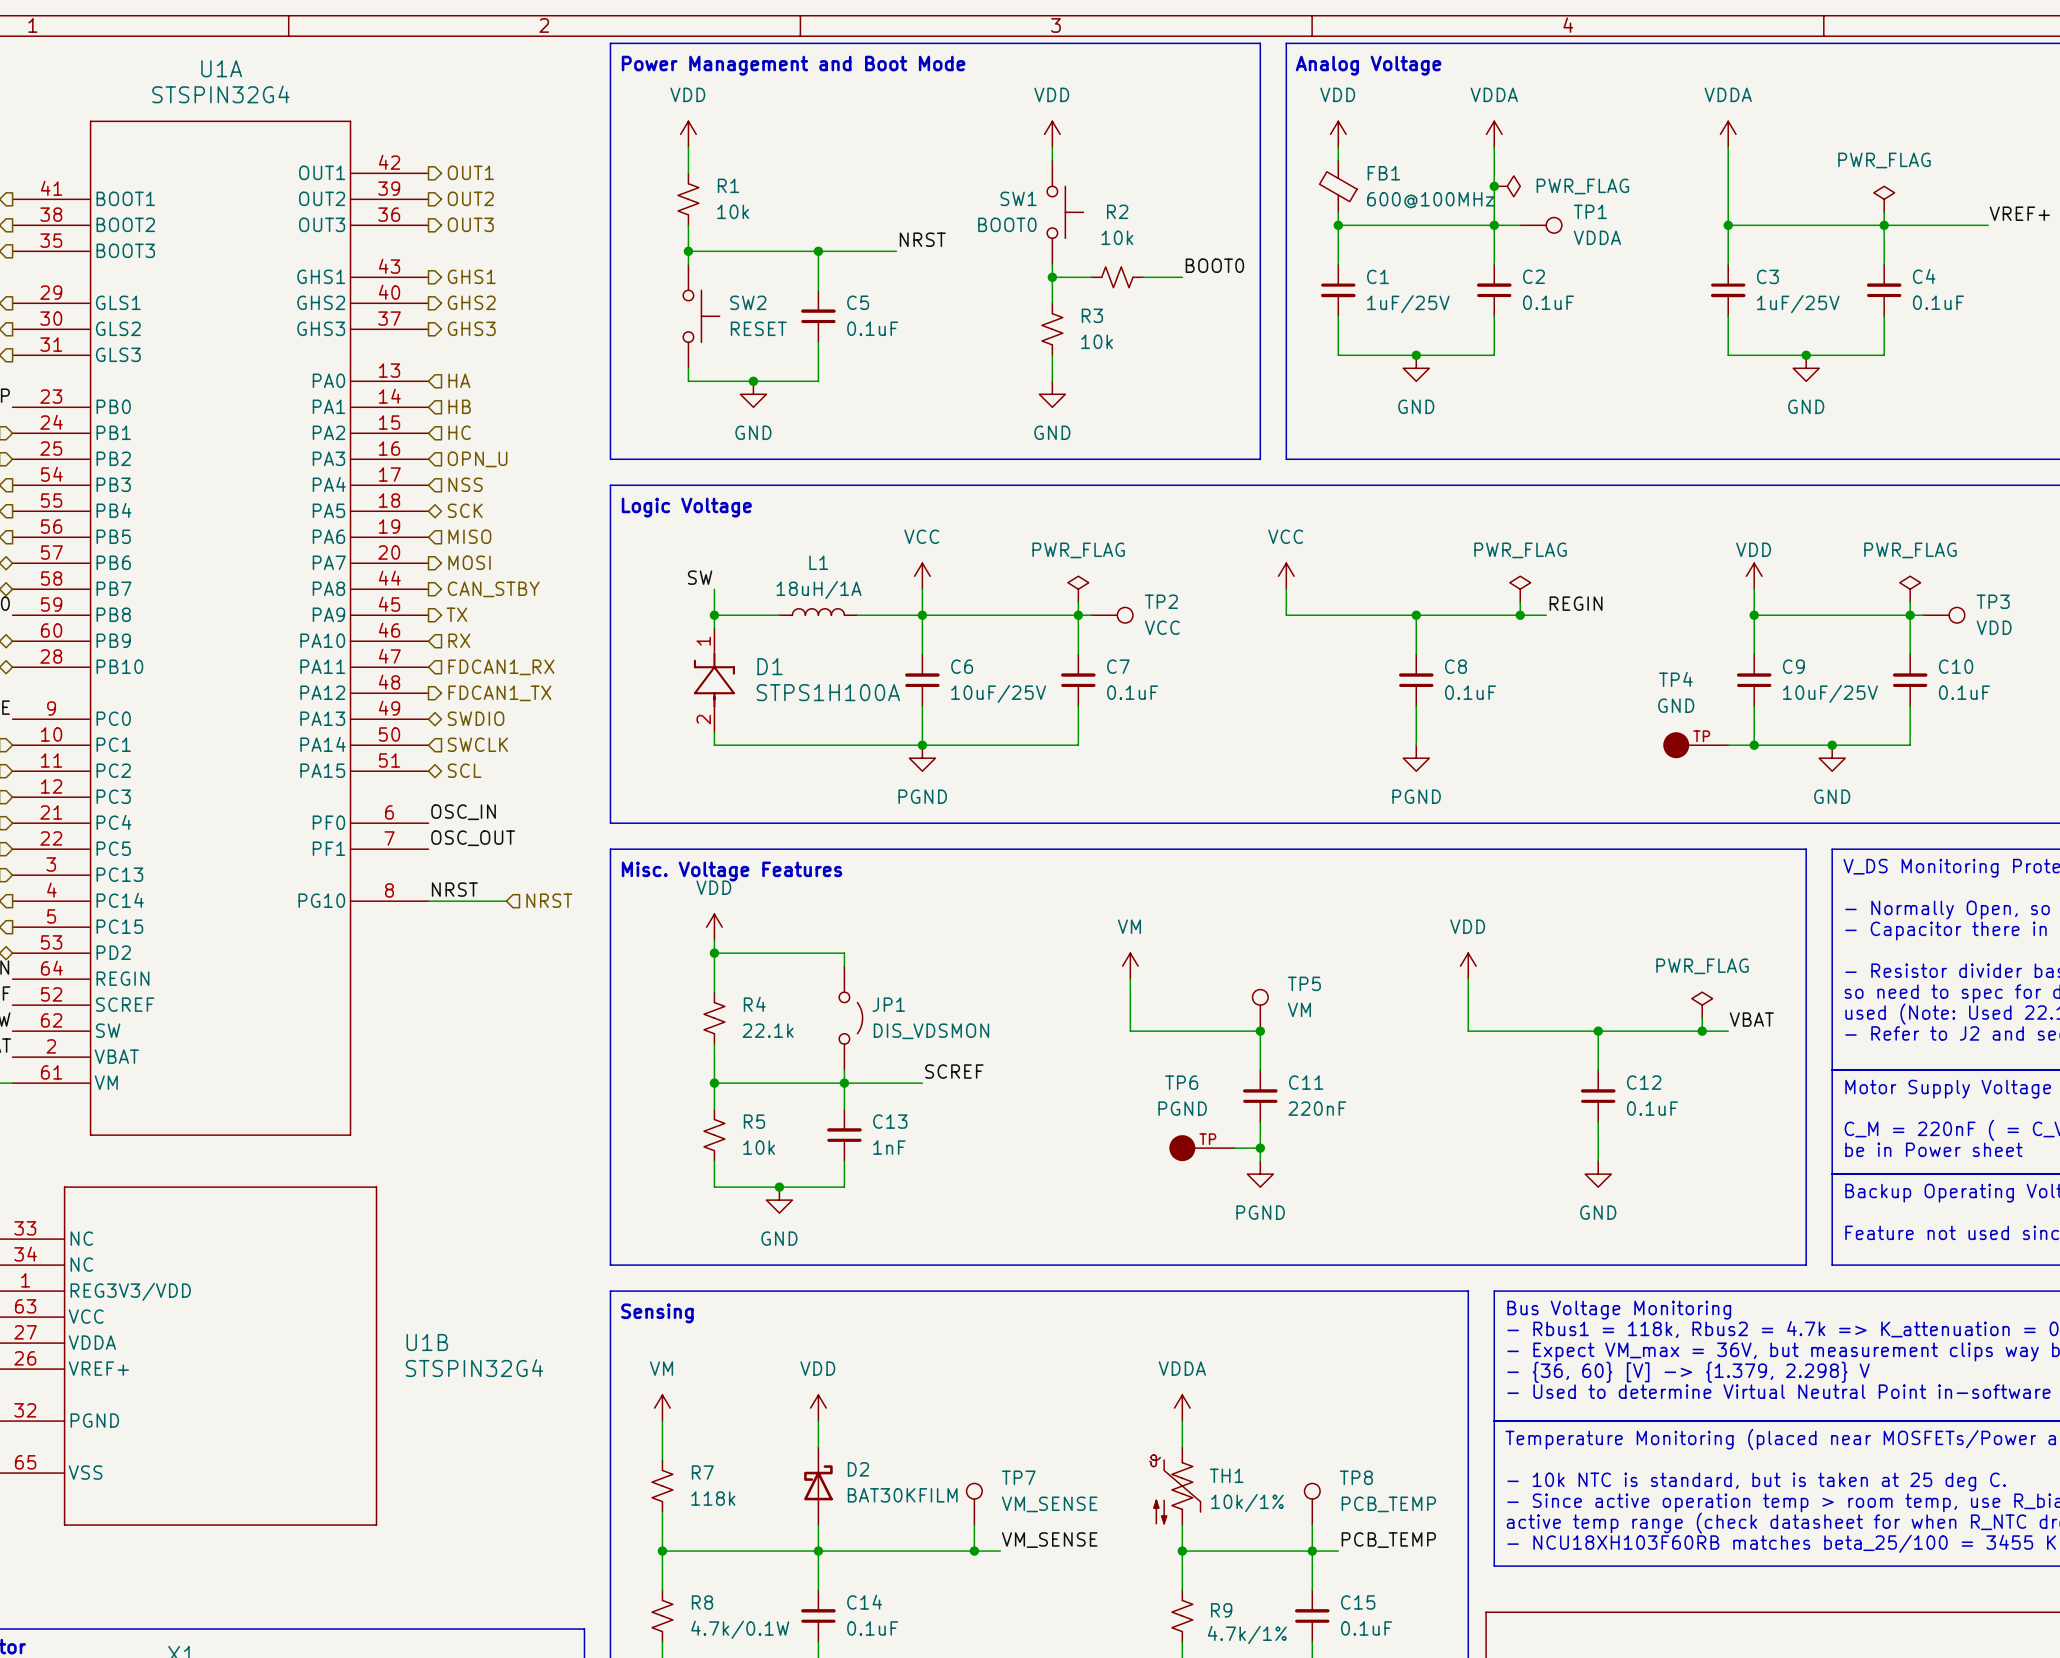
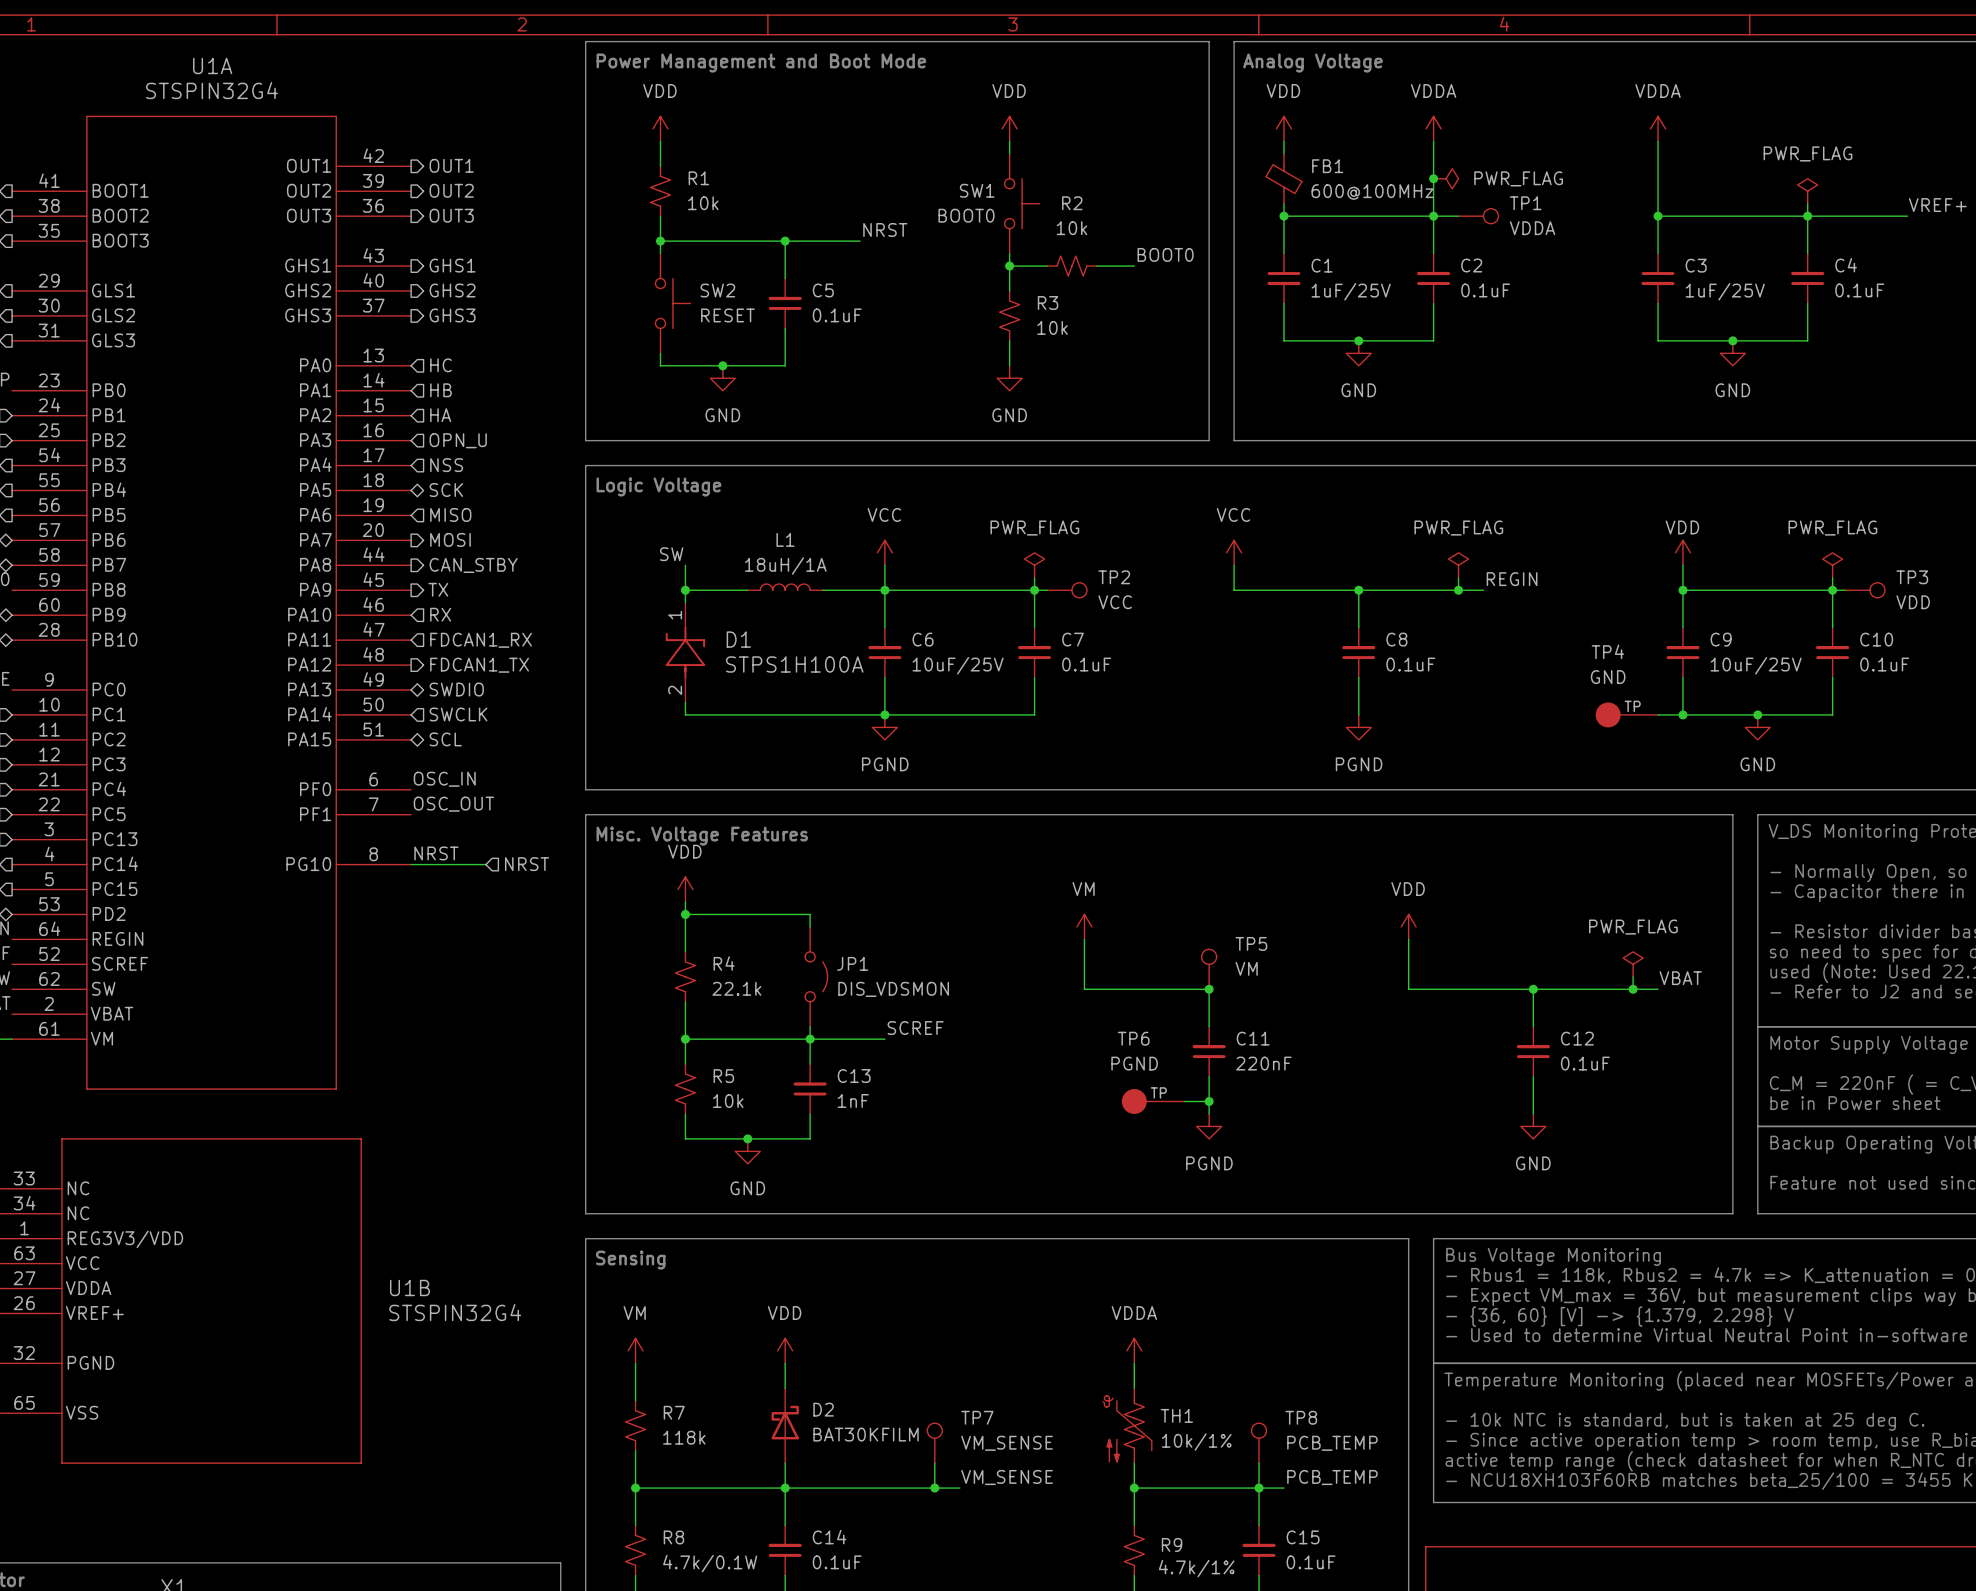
hierarchical label: HA (459, 380) -> HC (440, 365)
hierarchical label: HC (459, 432) -> HA (440, 415)

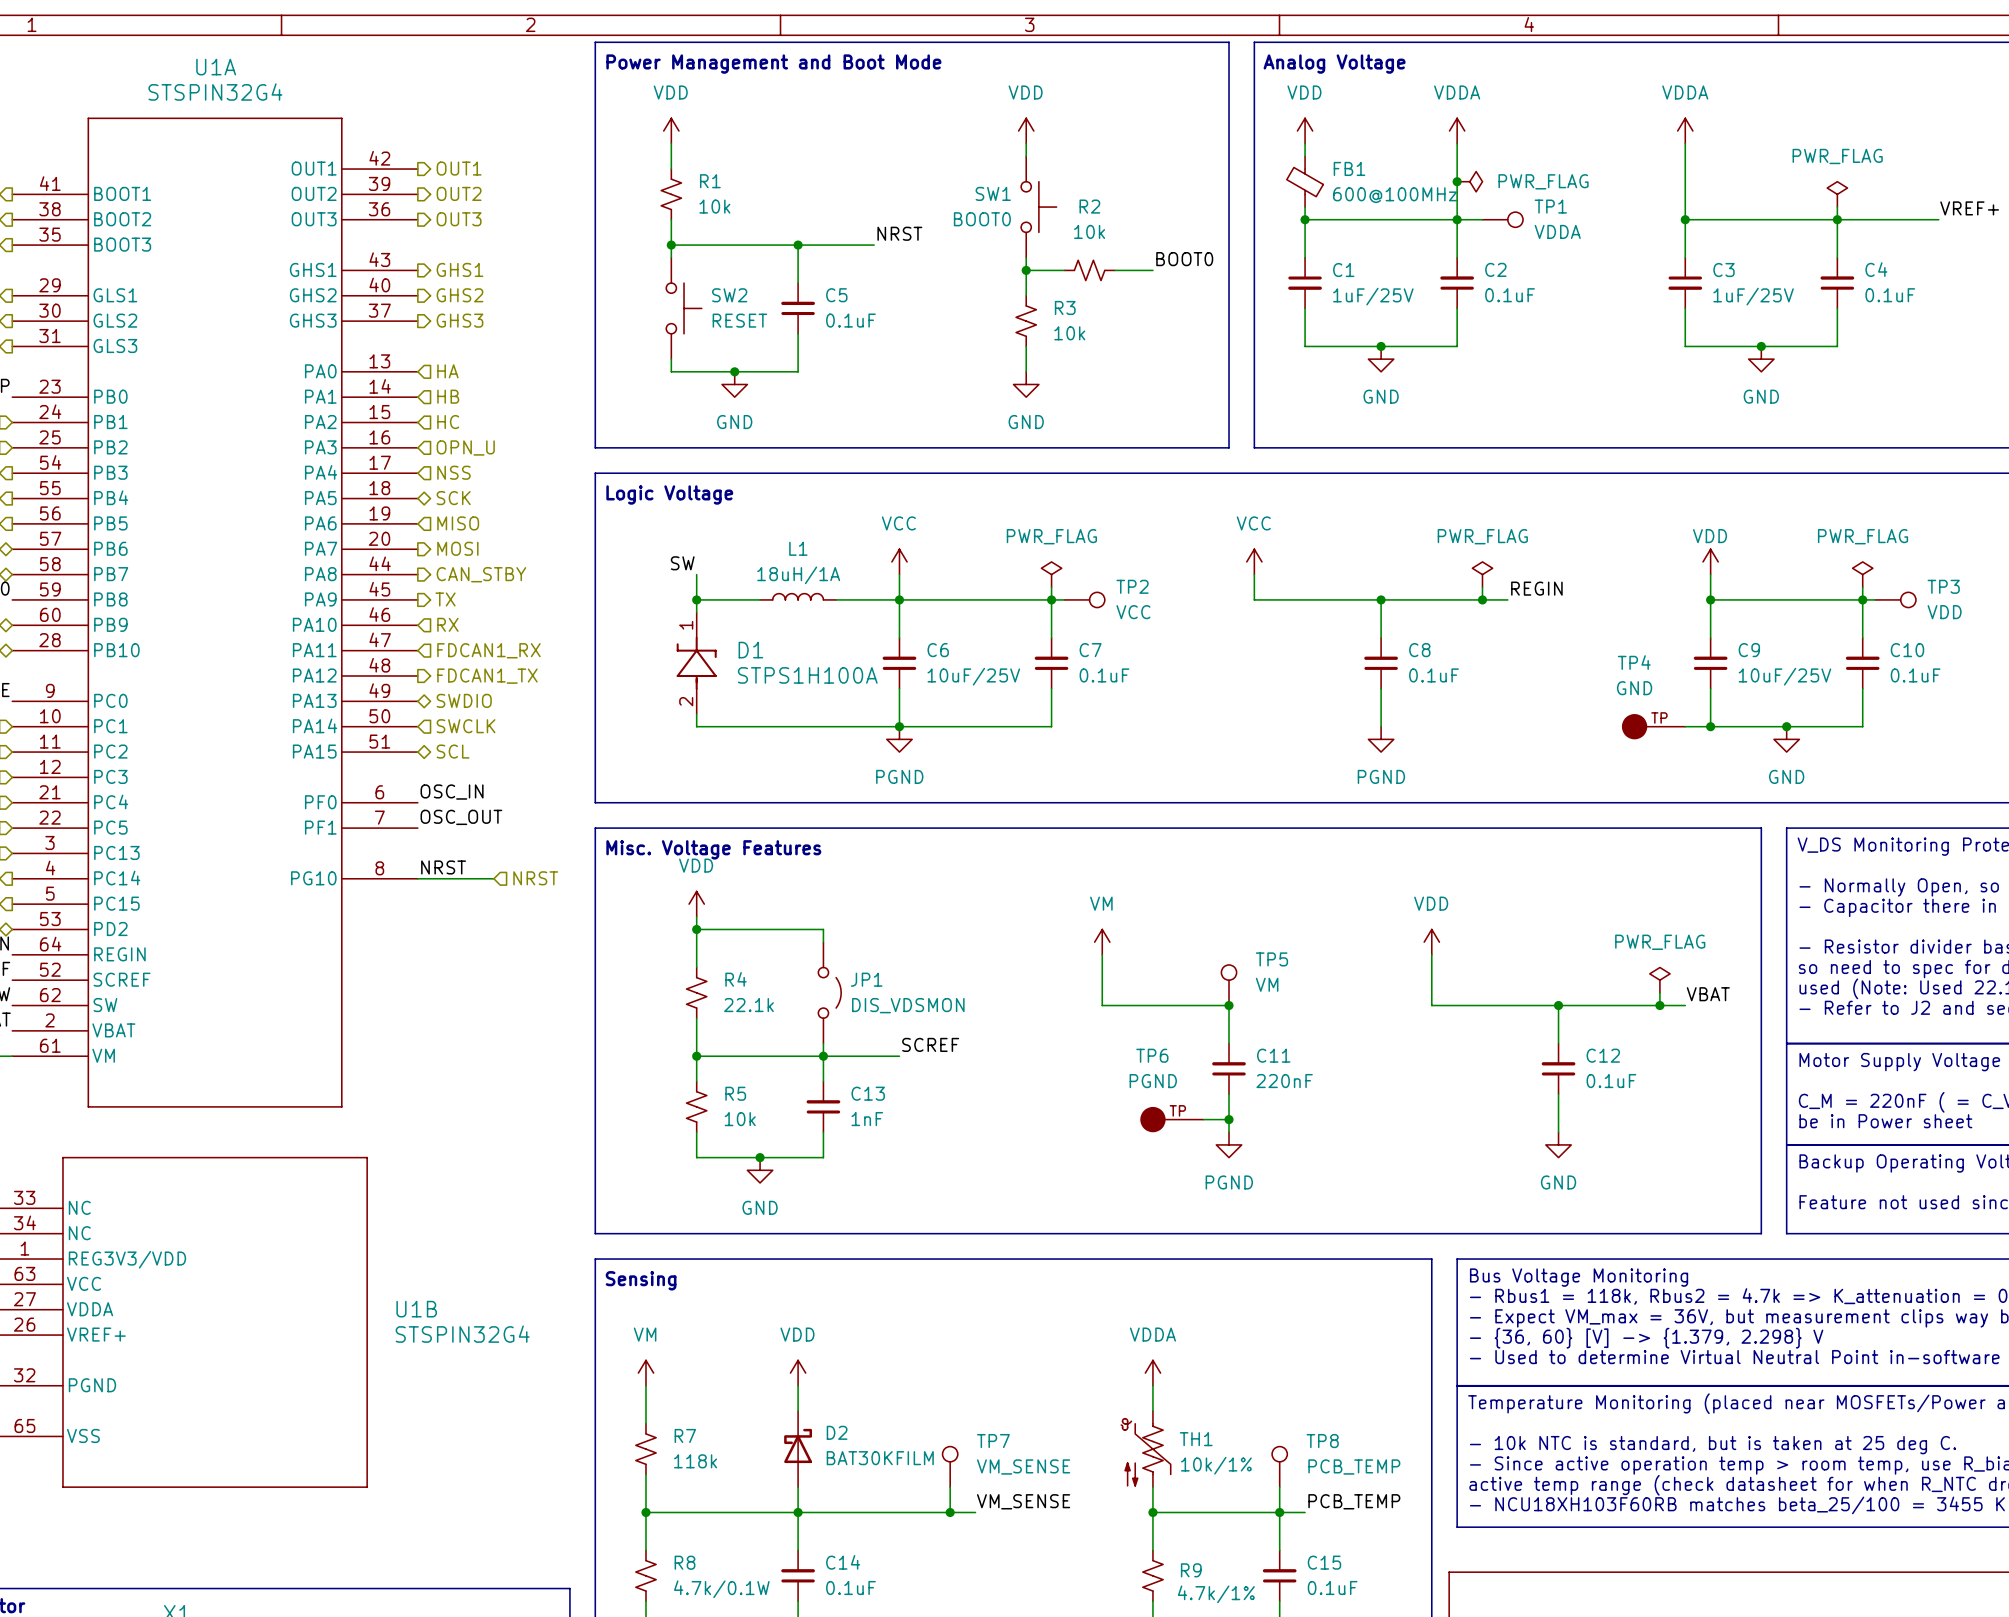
hierarchical label: HC (440, 365) -> HA (447, 371)
hierarchical label: HA (440, 415) -> HC (448, 422)

